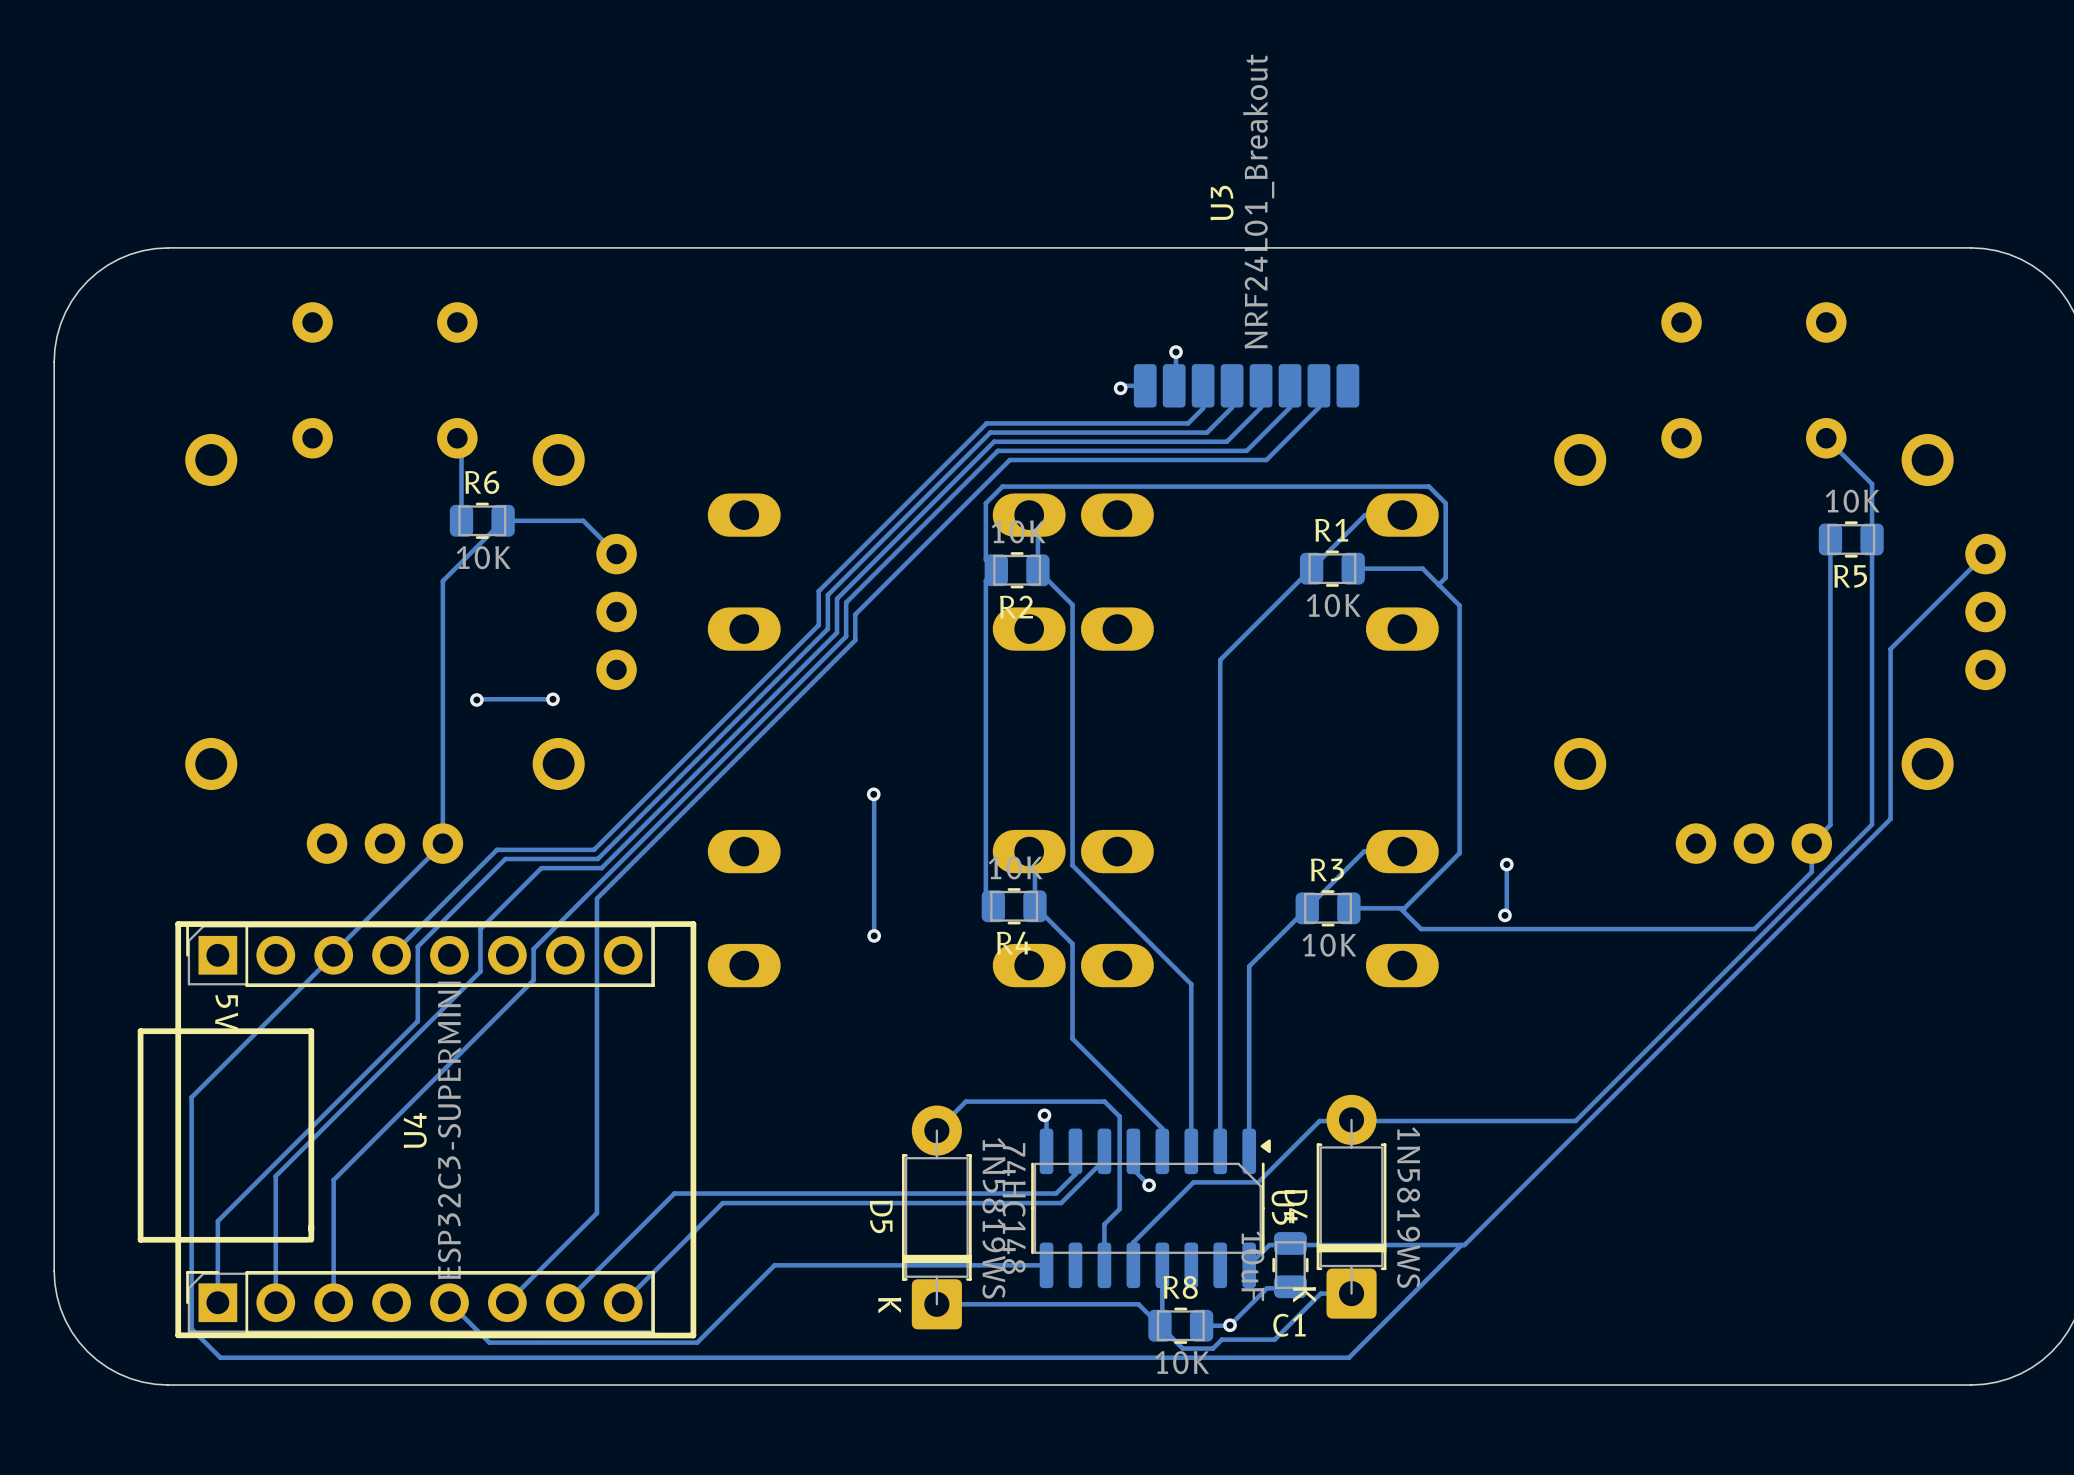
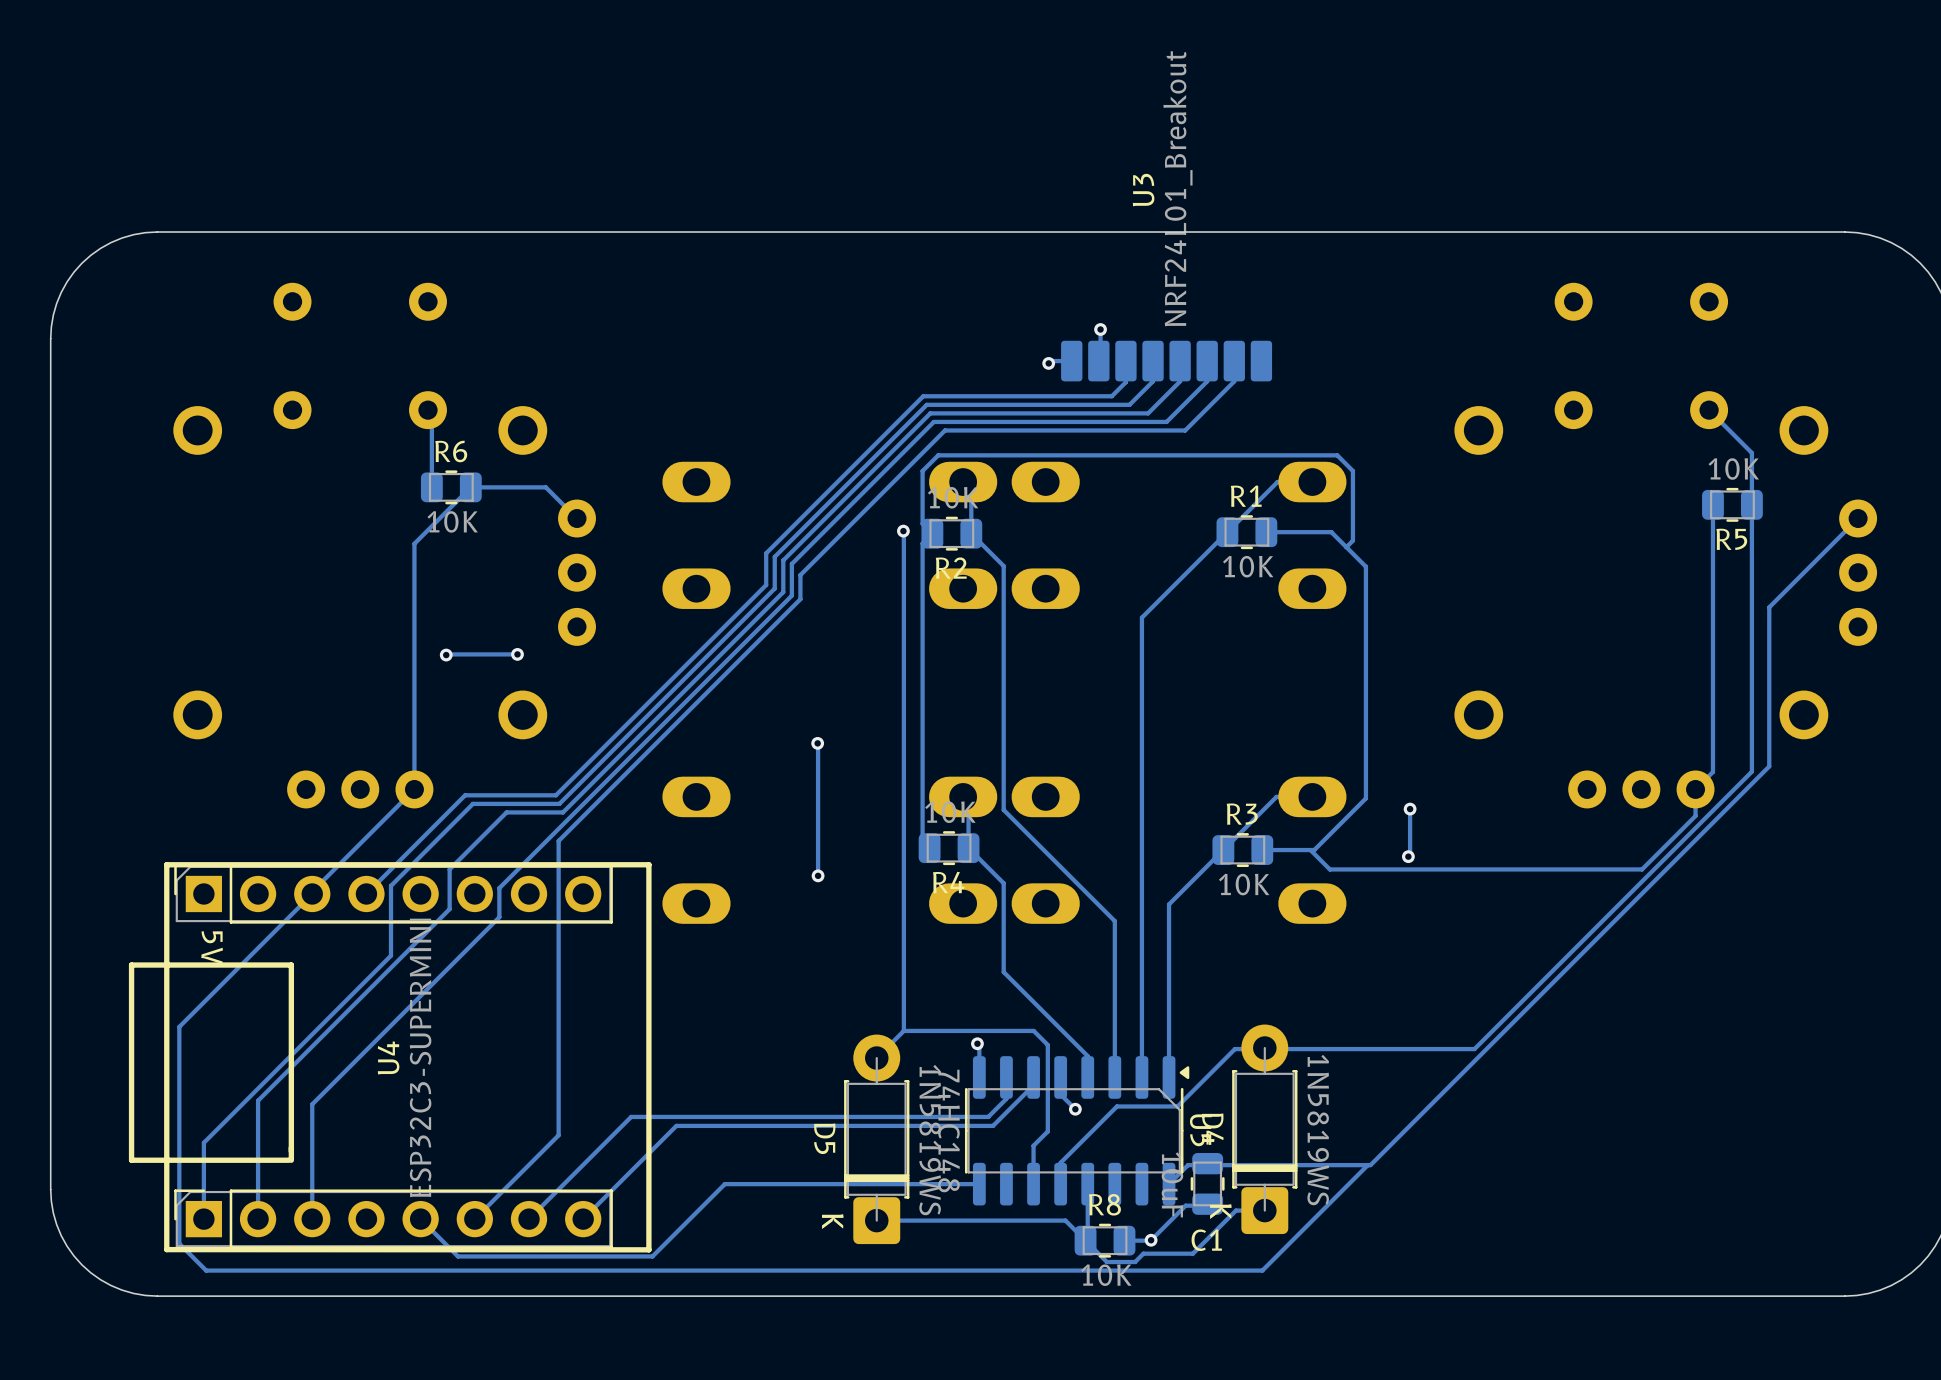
track: none -> (903, 531) (903, 1030)
via: none -> (903, 531)

